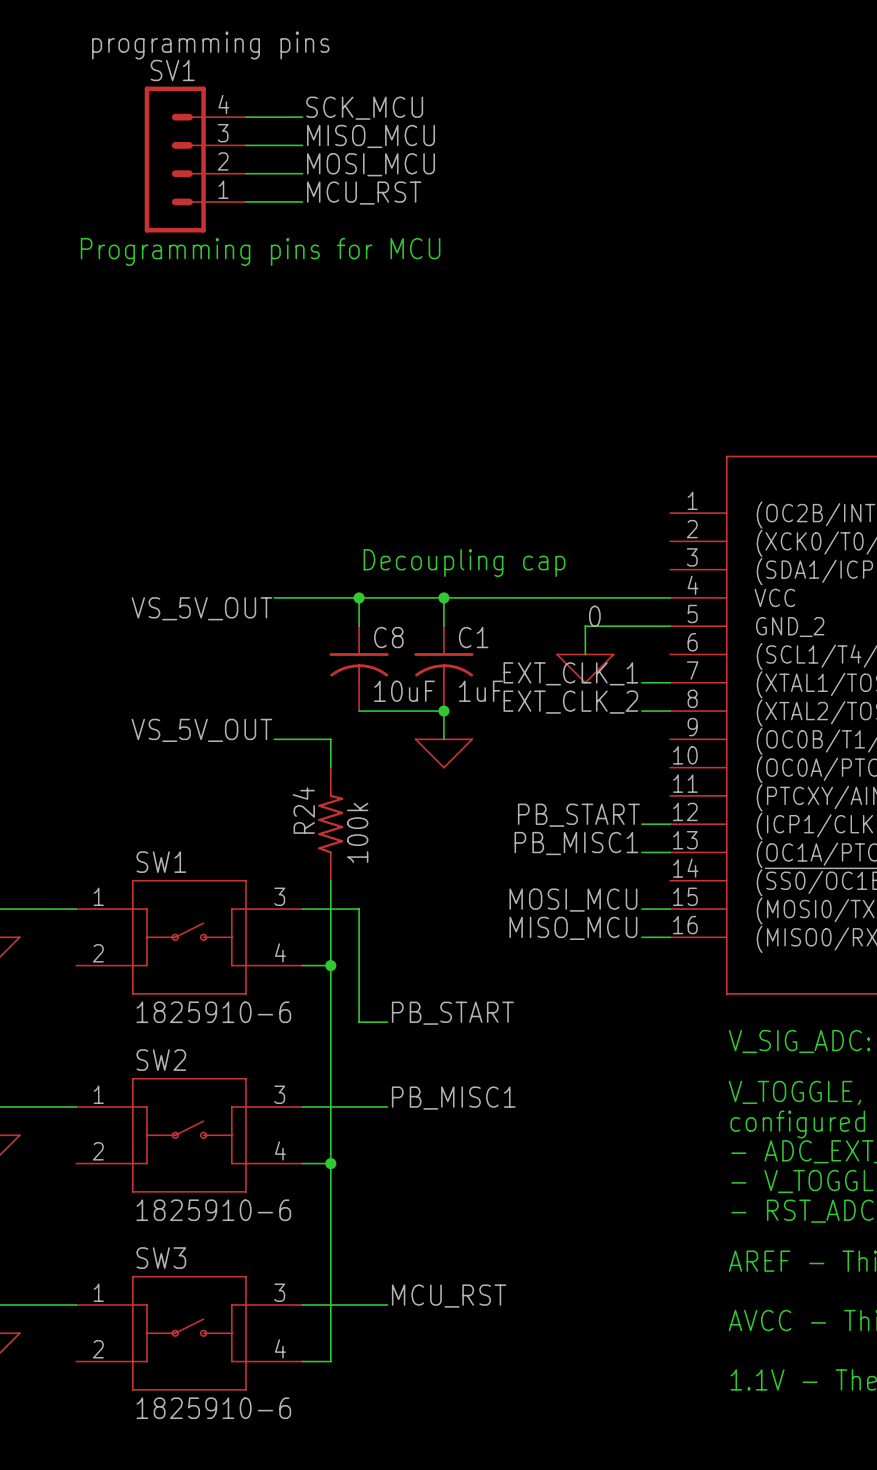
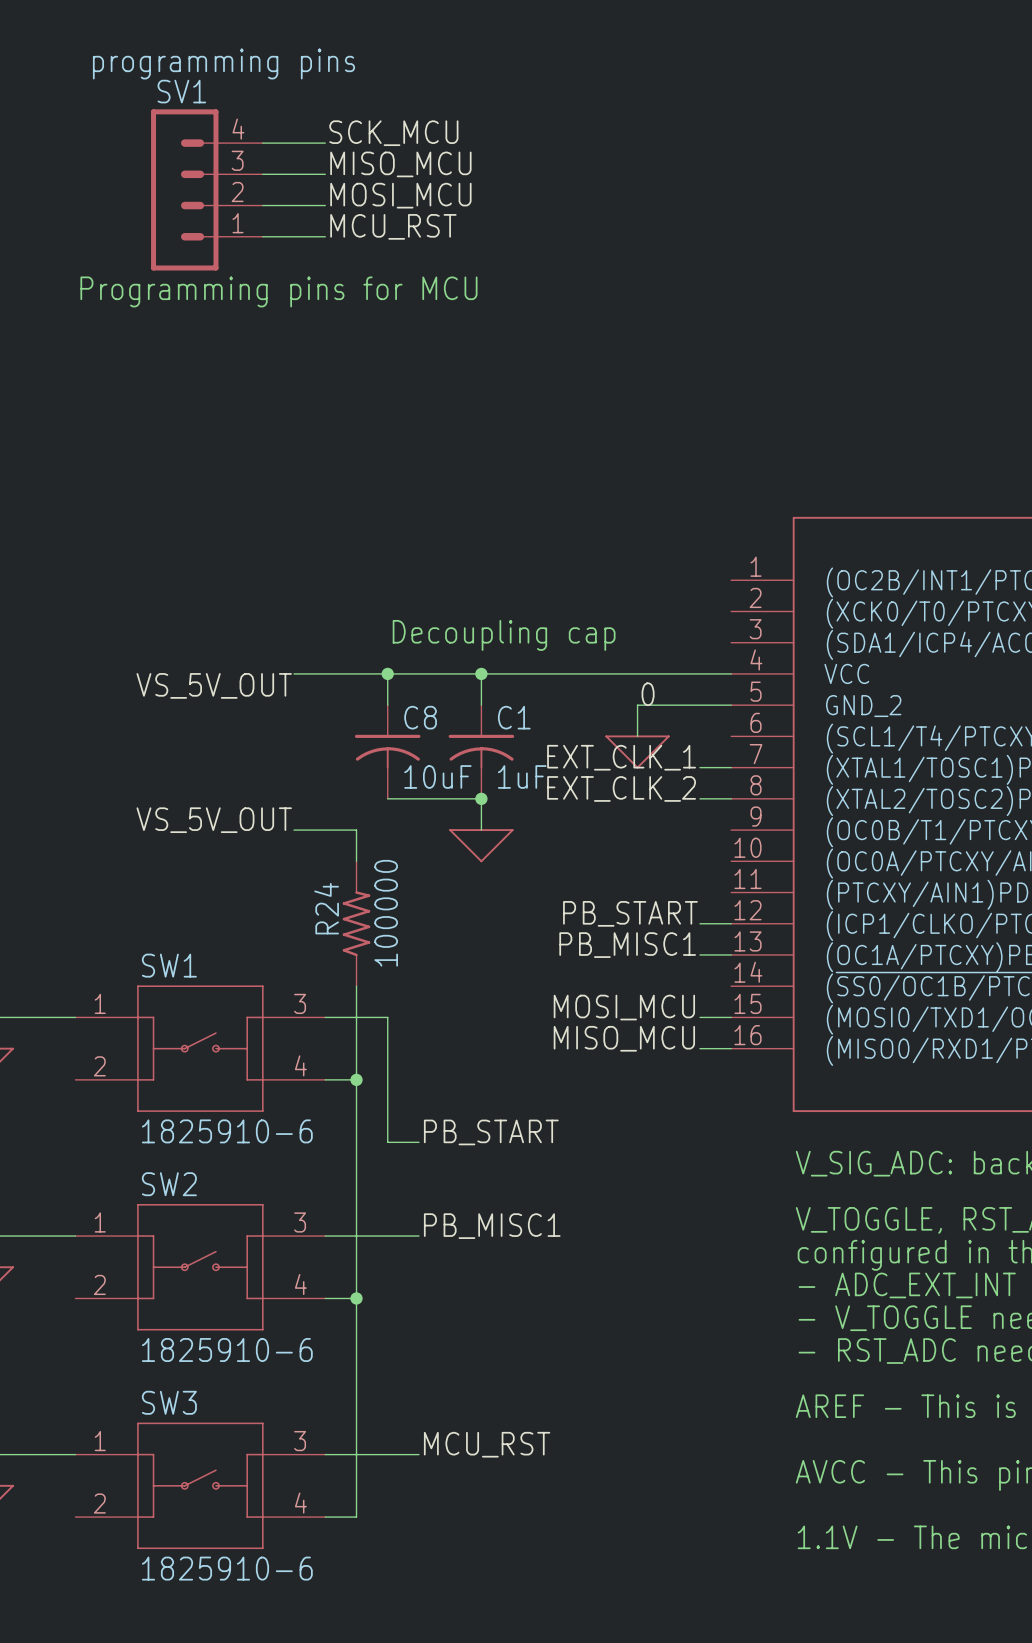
R24 value: 100k (357, 832) -> 100000 (386, 913)

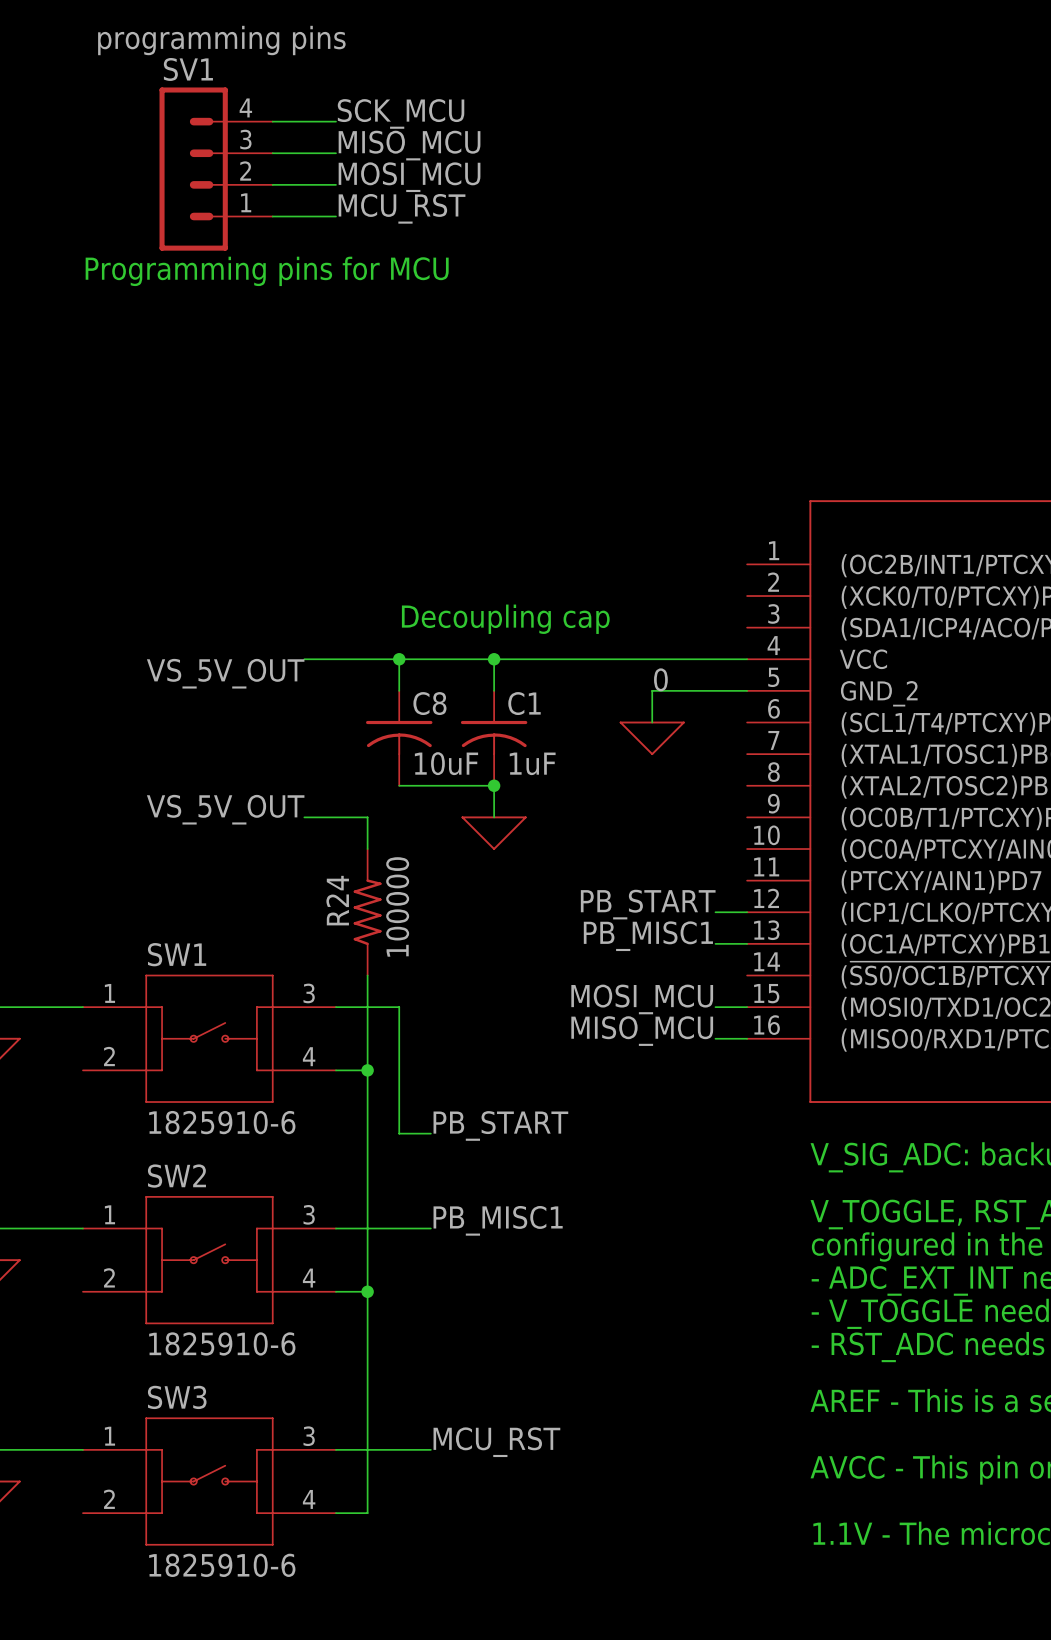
label: EXT_CLK_1 (621, 757) -> none
wire: (699, 767) (731, 767) -> none
label: EXT_CLK_2 (621, 788) -> none
wire: (699, 798) (731, 798) -> none

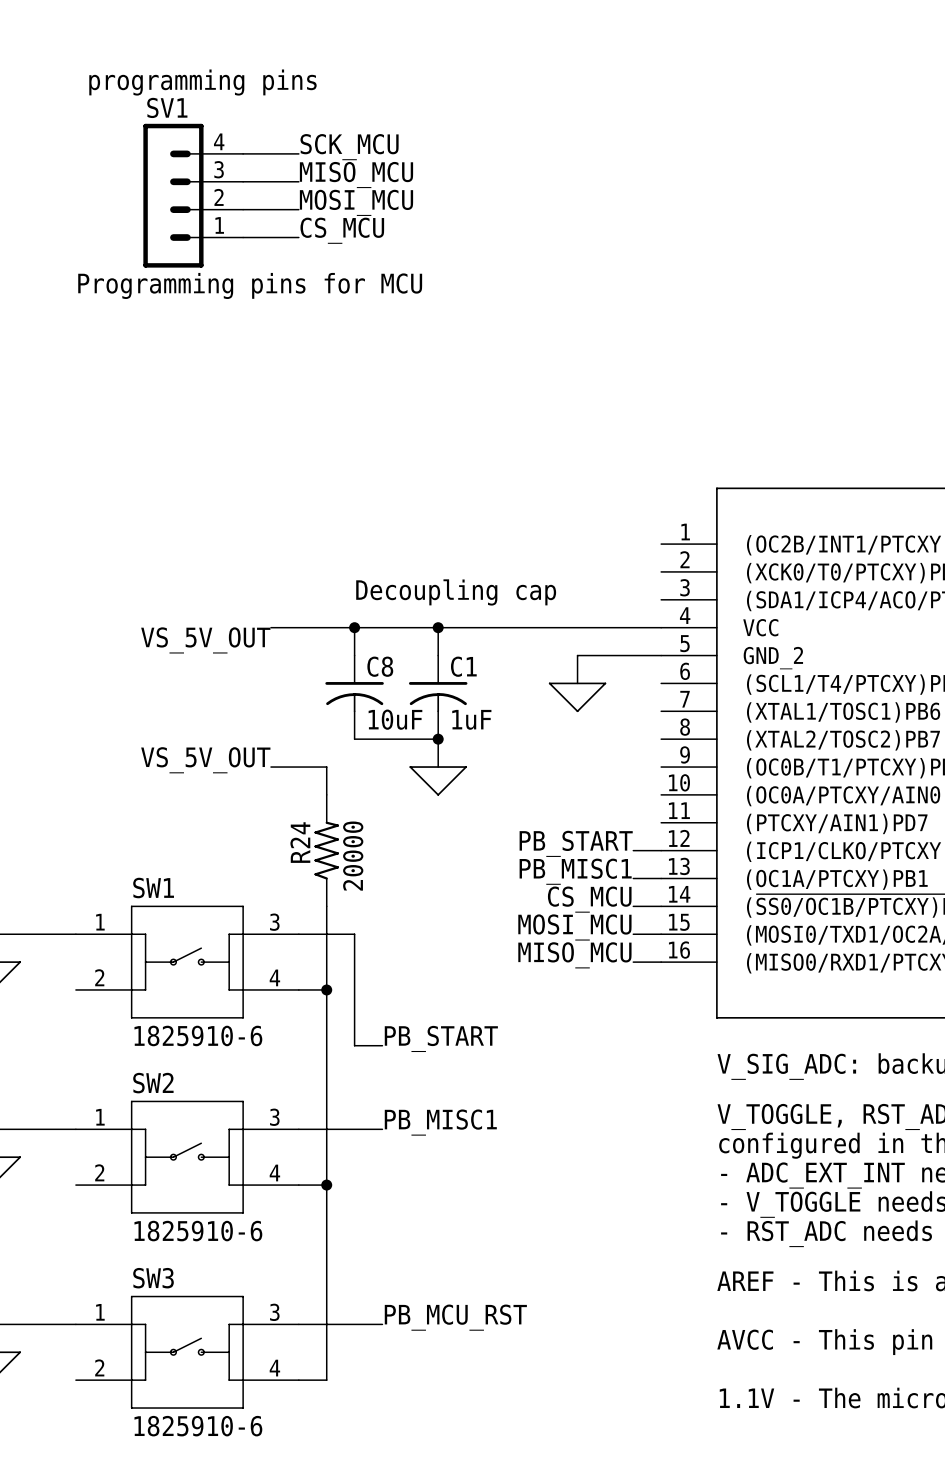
label: MCU_RST (402, 208) -> CS_MCU (342, 230)
label: 0 (660, 679) -> none
R24 value: 100000 (397, 906) -> 20000 (353, 856)
label: none -> CS_MCU (589, 899)
wire: none -> (633, 906) (661, 906)
label: MCU_RST (496, 1442) -> PB_MCU_RST (455, 1317)

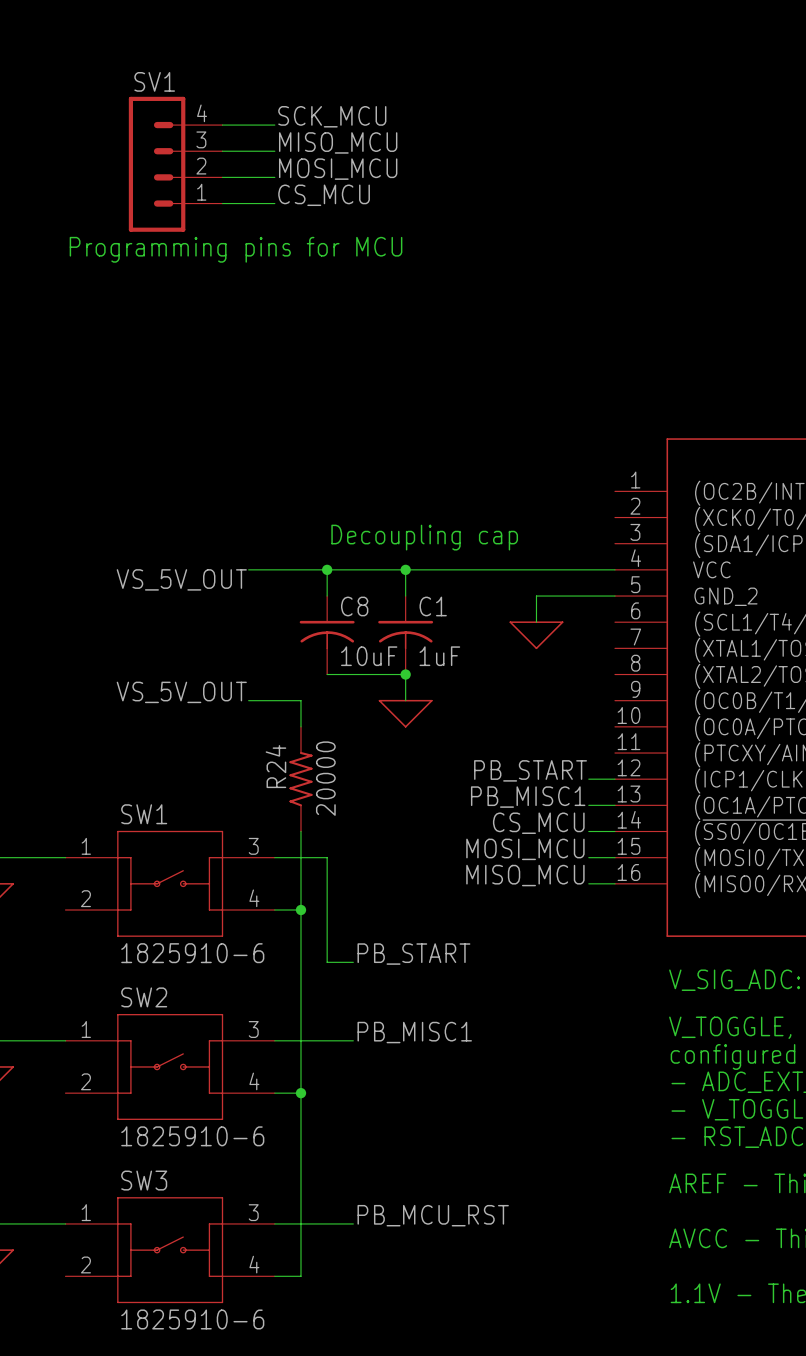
SV1 value: programming pins (202, 82) -> none

